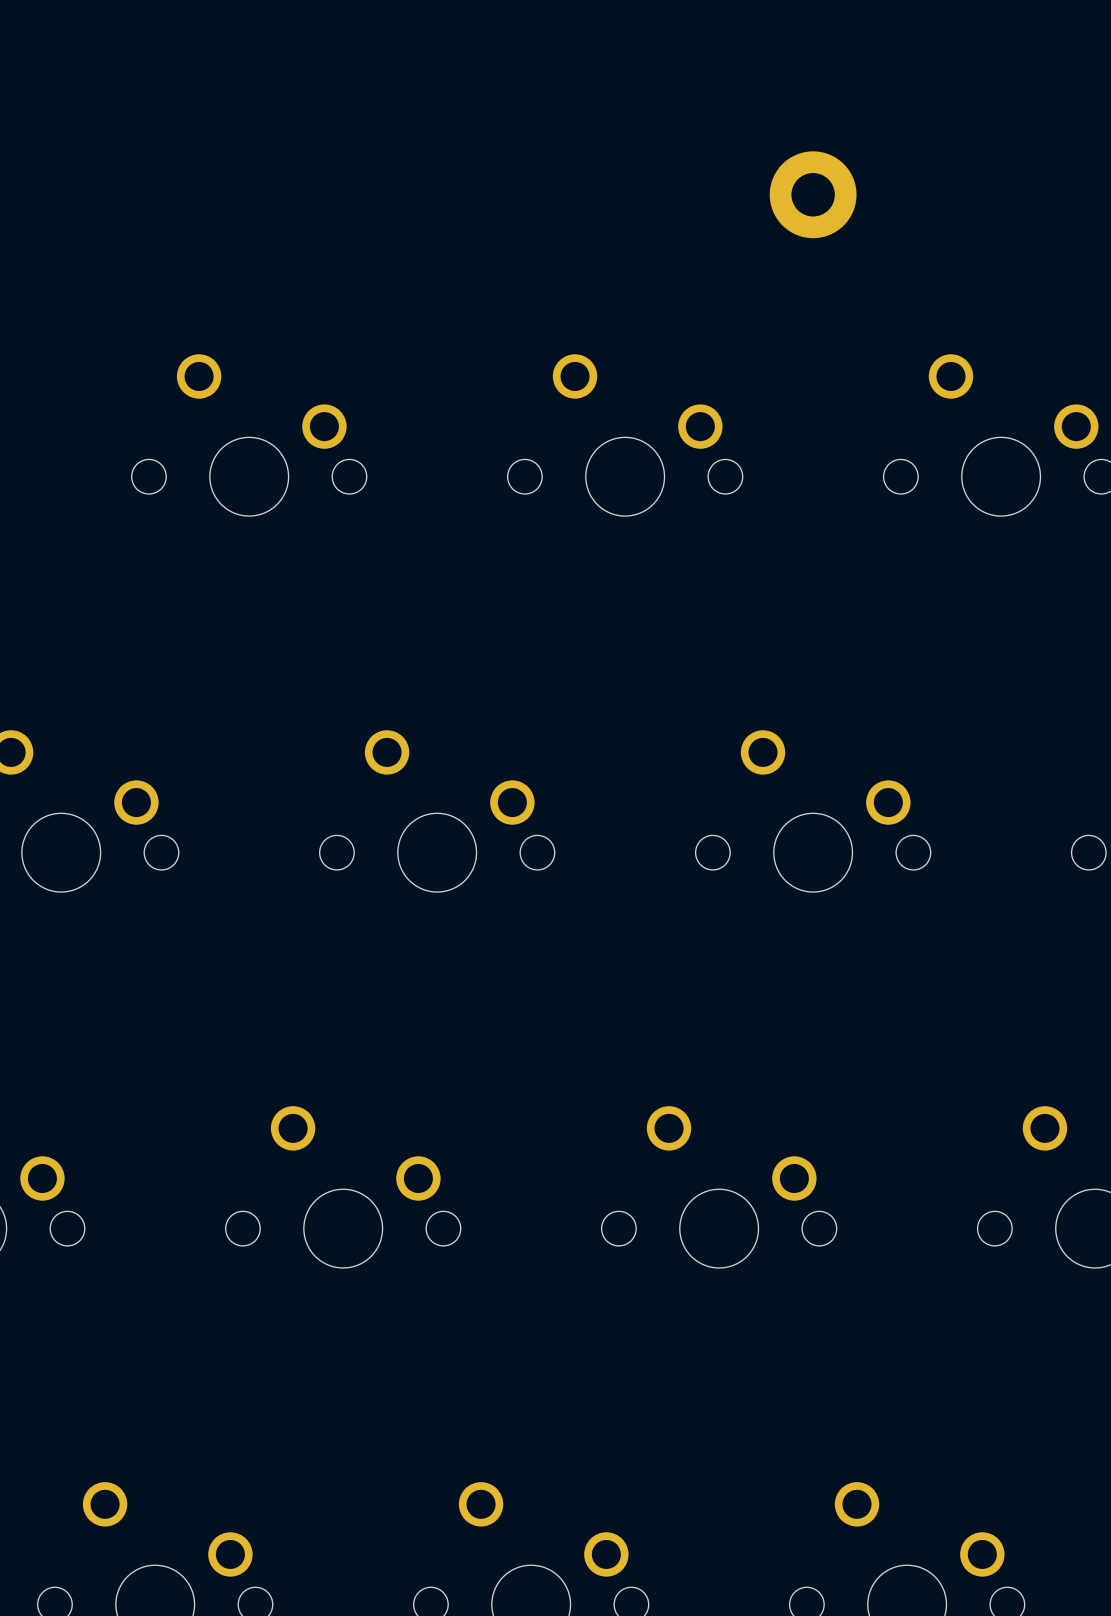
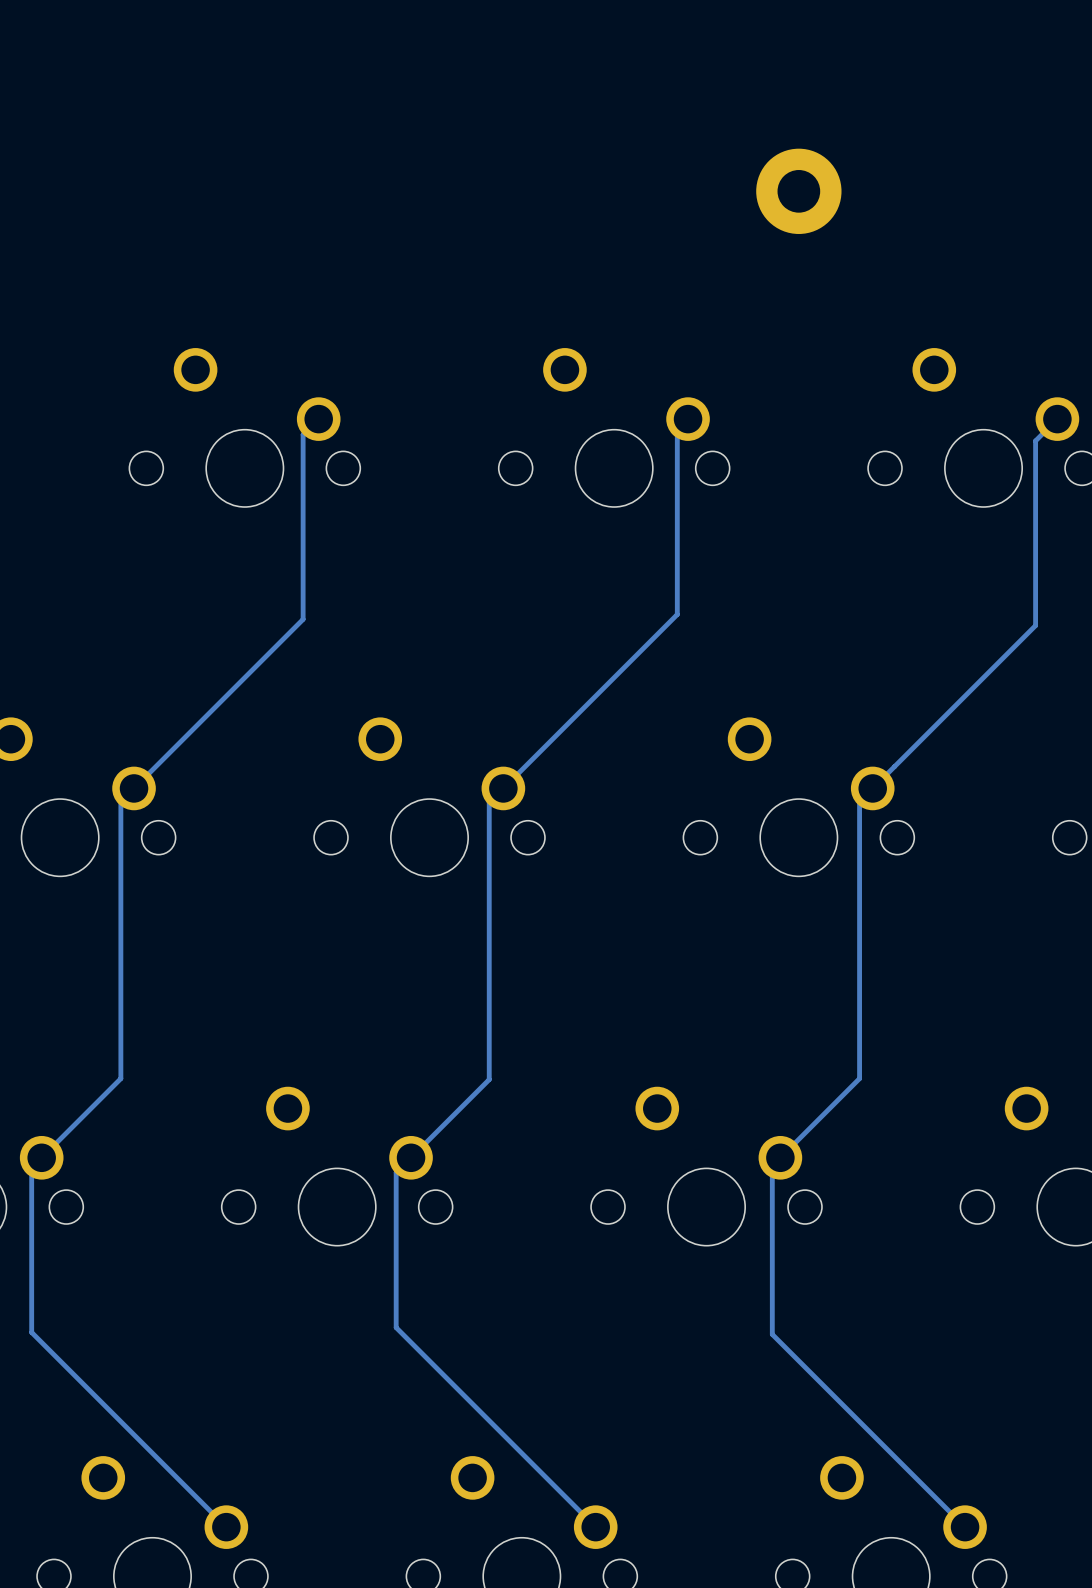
bottom track: none -> (318, 419) (303, 434) (303, 619) (120, 801) (120, 1078) (31, 1167) (31, 1332) (226, 1527)
bottom track: none -> (688, 419) (677, 429) (677, 614) (489, 802) (489, 1079) (396, 1172) (396, 1327) (595, 1527)
bottom track: none -> (1057, 419) (1035, 440) (1035, 625) (859, 801) (859, 1078) (772, 1165) (772, 1334) (965, 1527)

